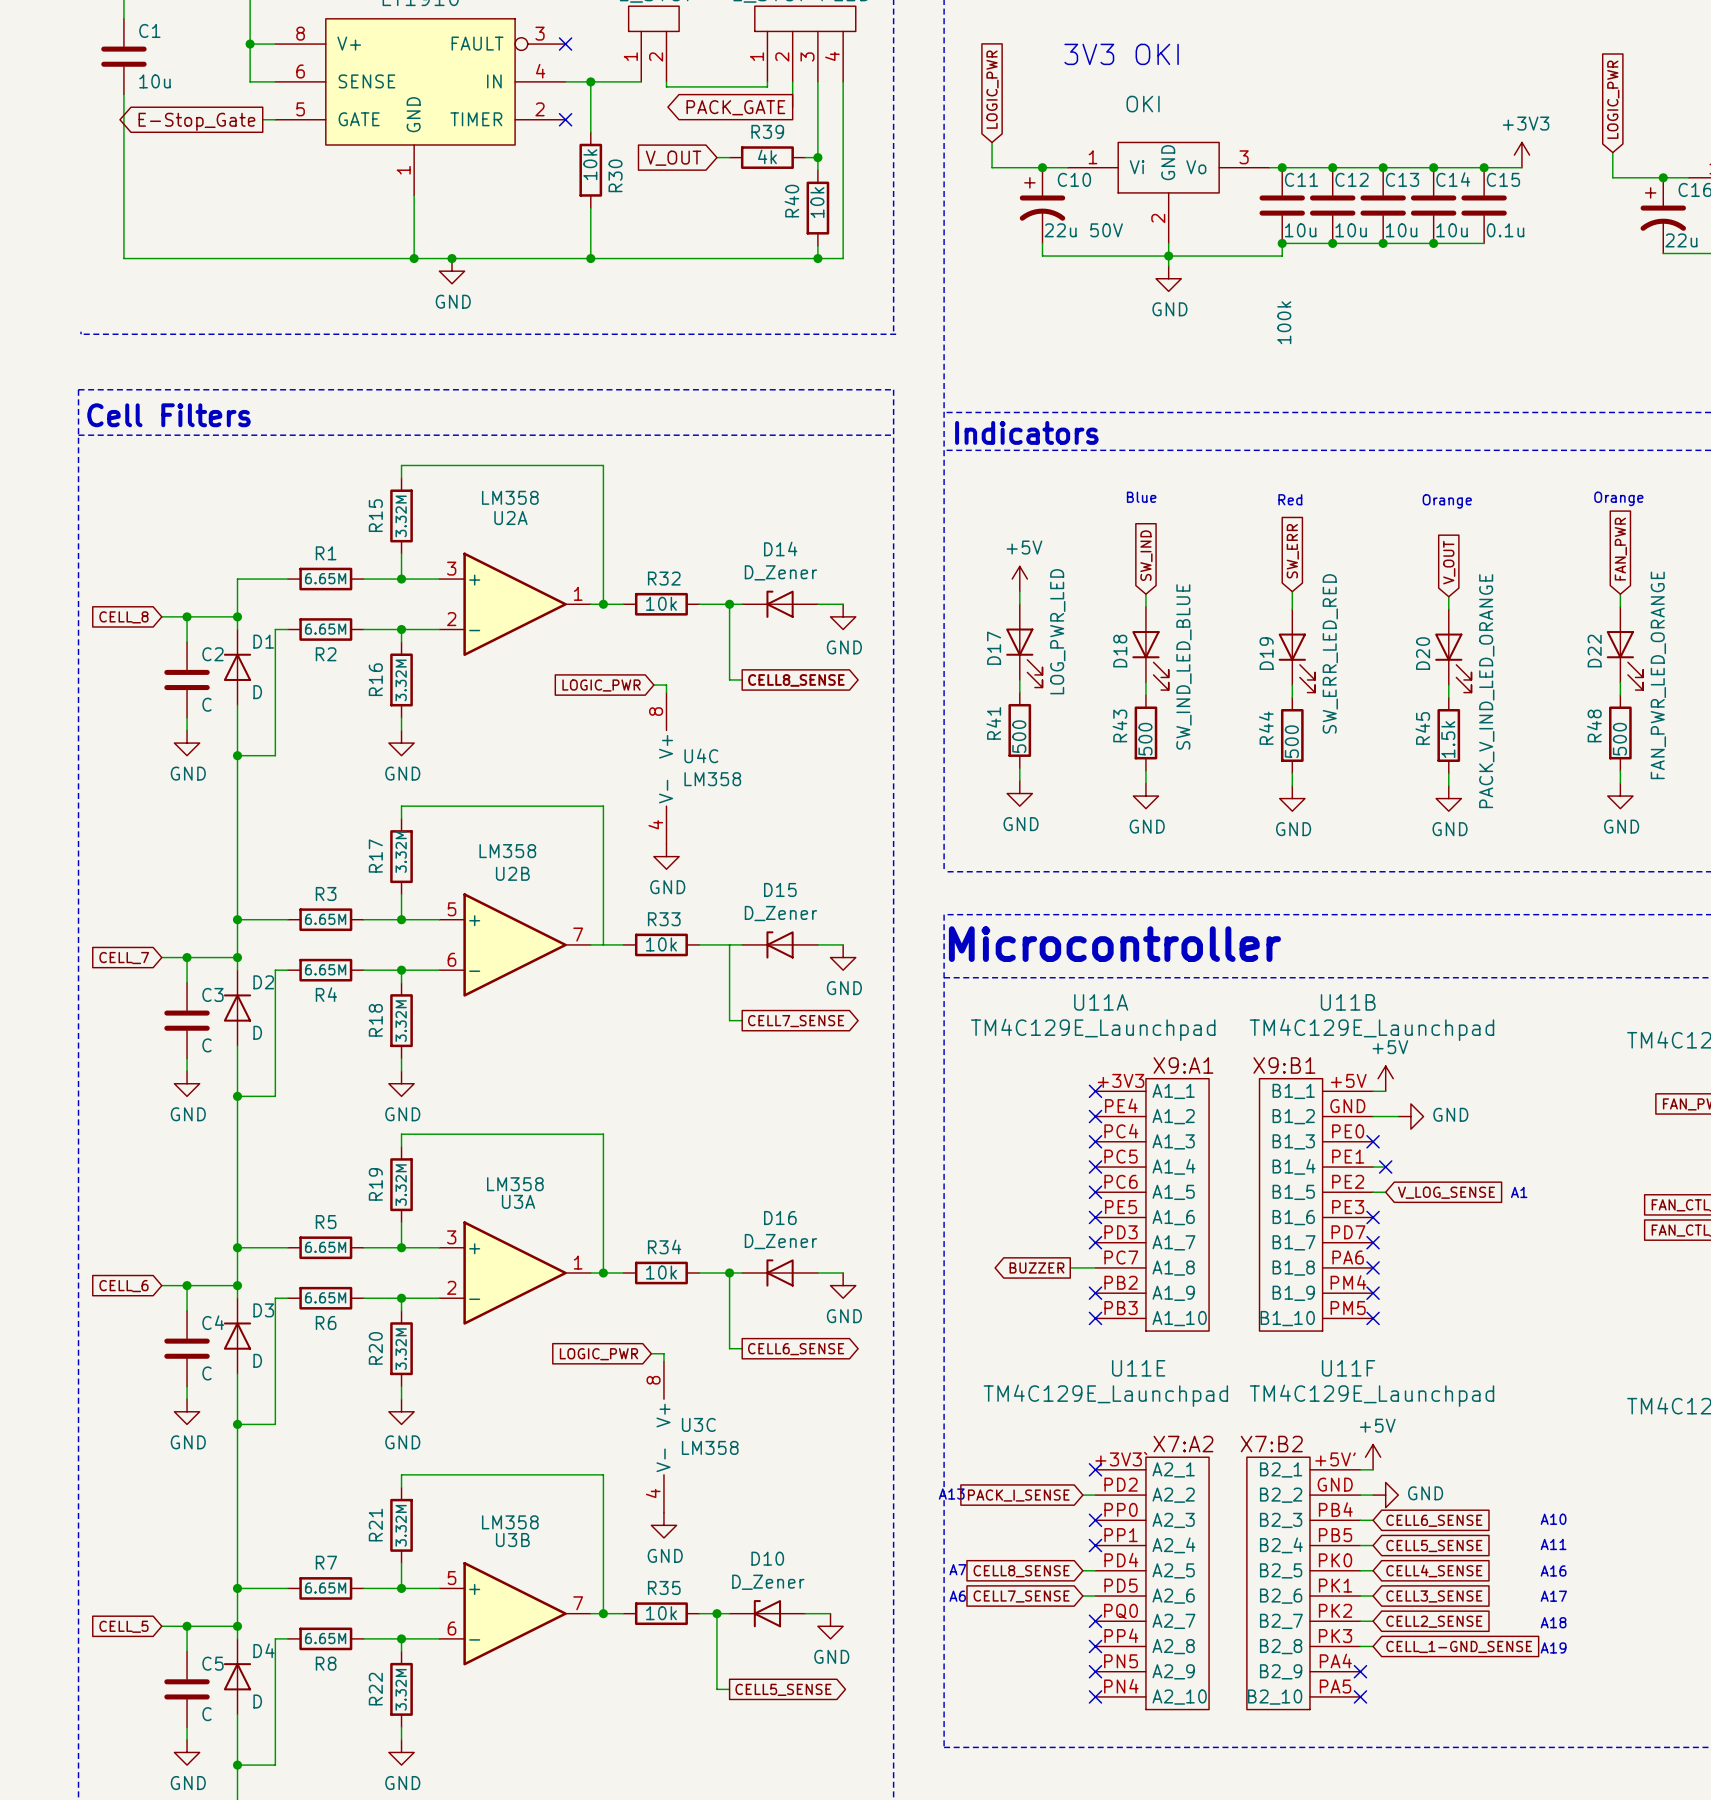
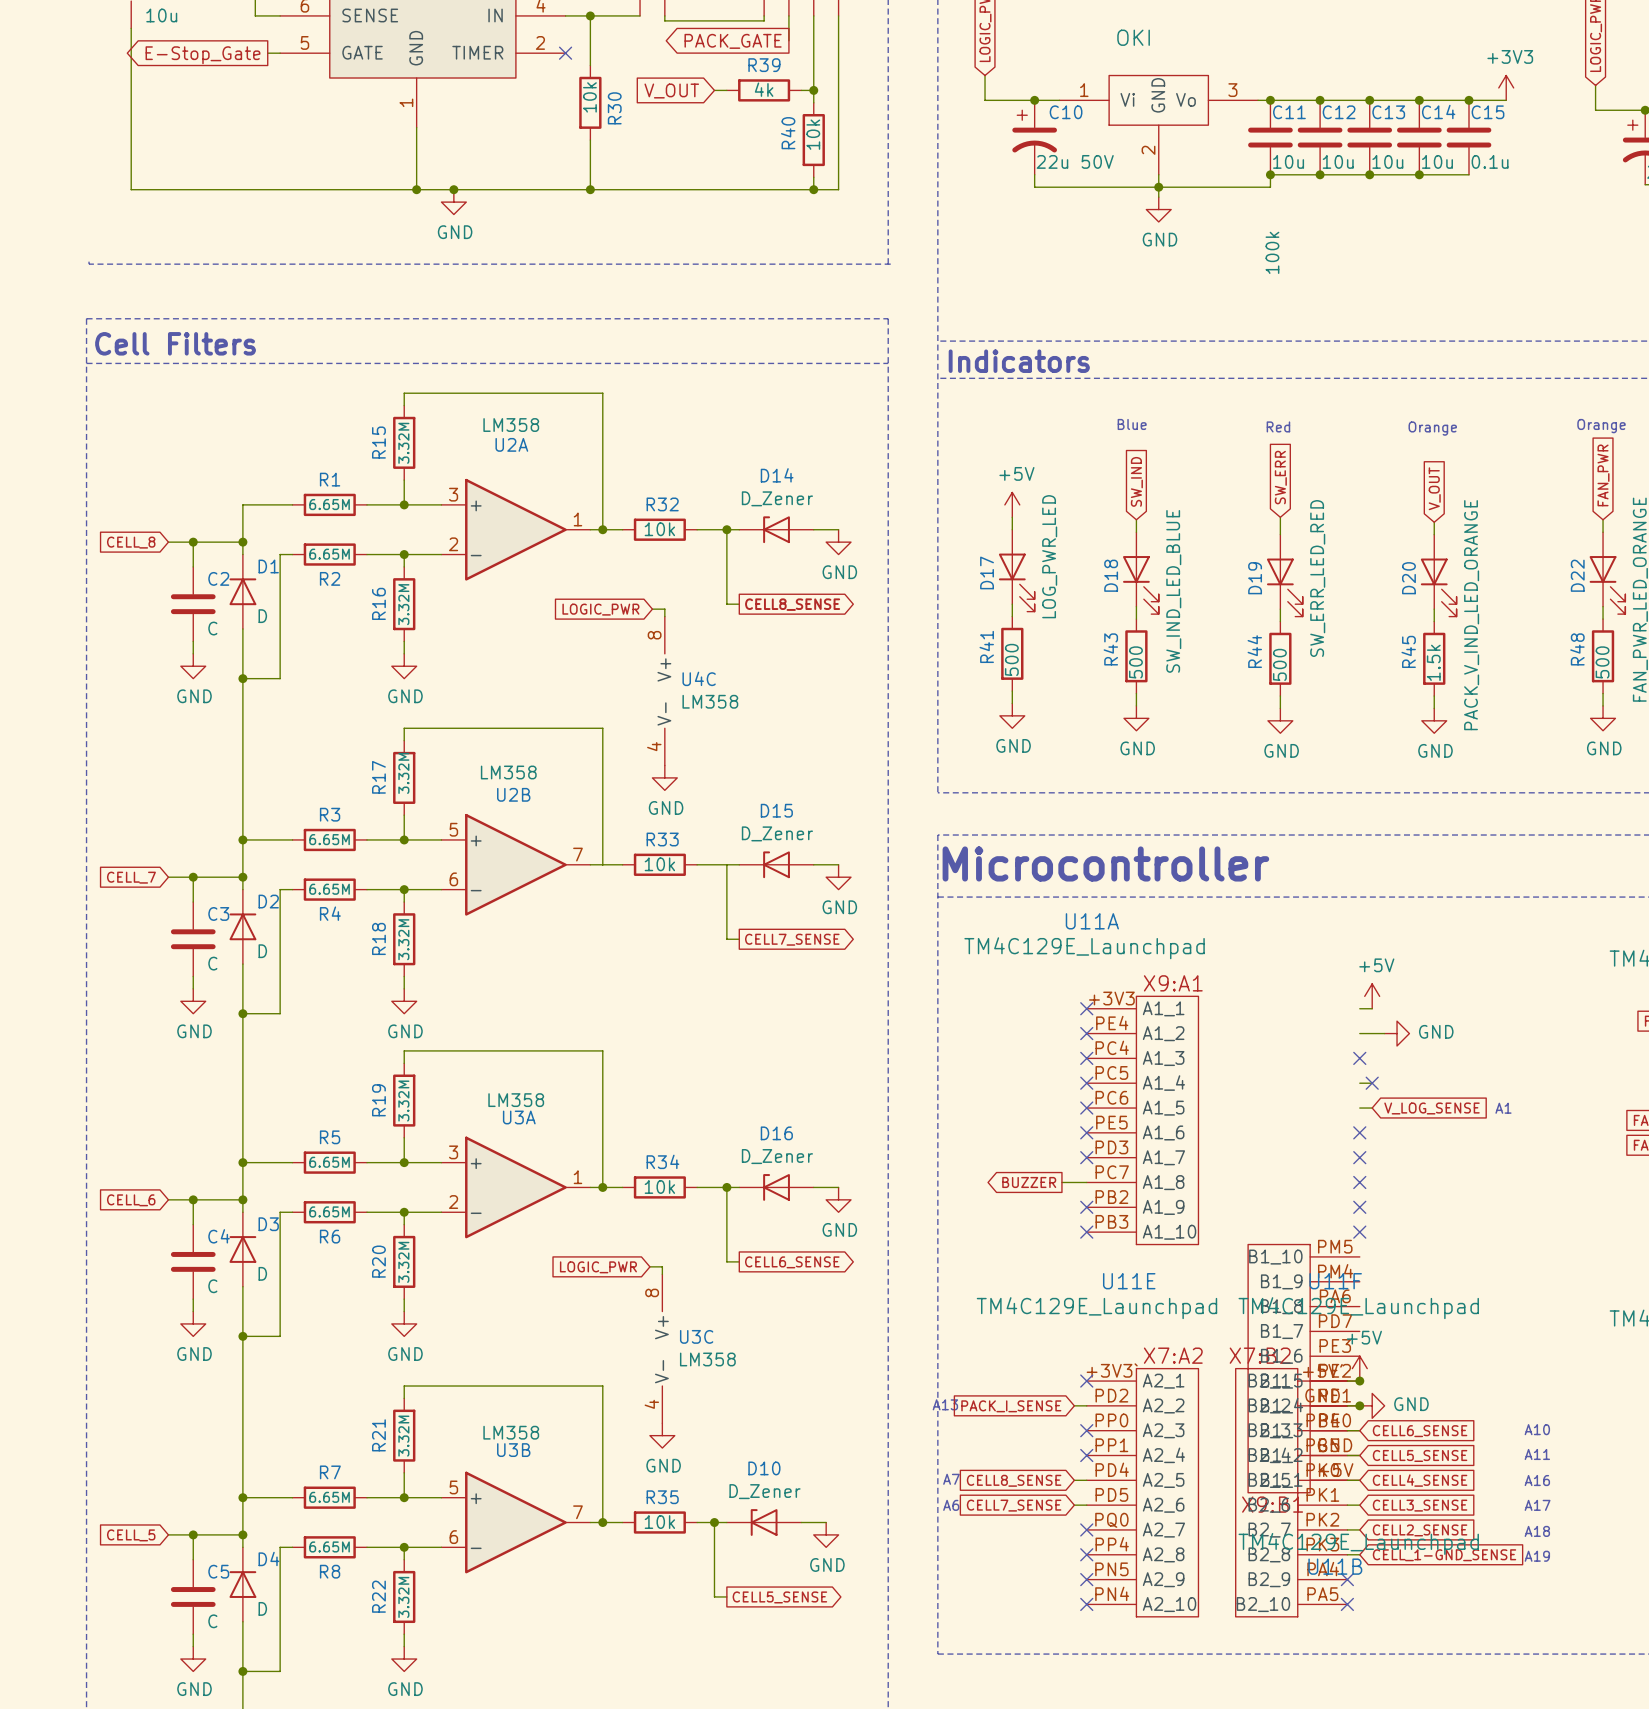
U11B flip: as is (1291, 1204) -> up-down (1279, 1368)
U11B position: (1316, 1204) -> (1303, 1368)
junction: none -> (1359, 1381)
junction: none -> (1359, 1405)

